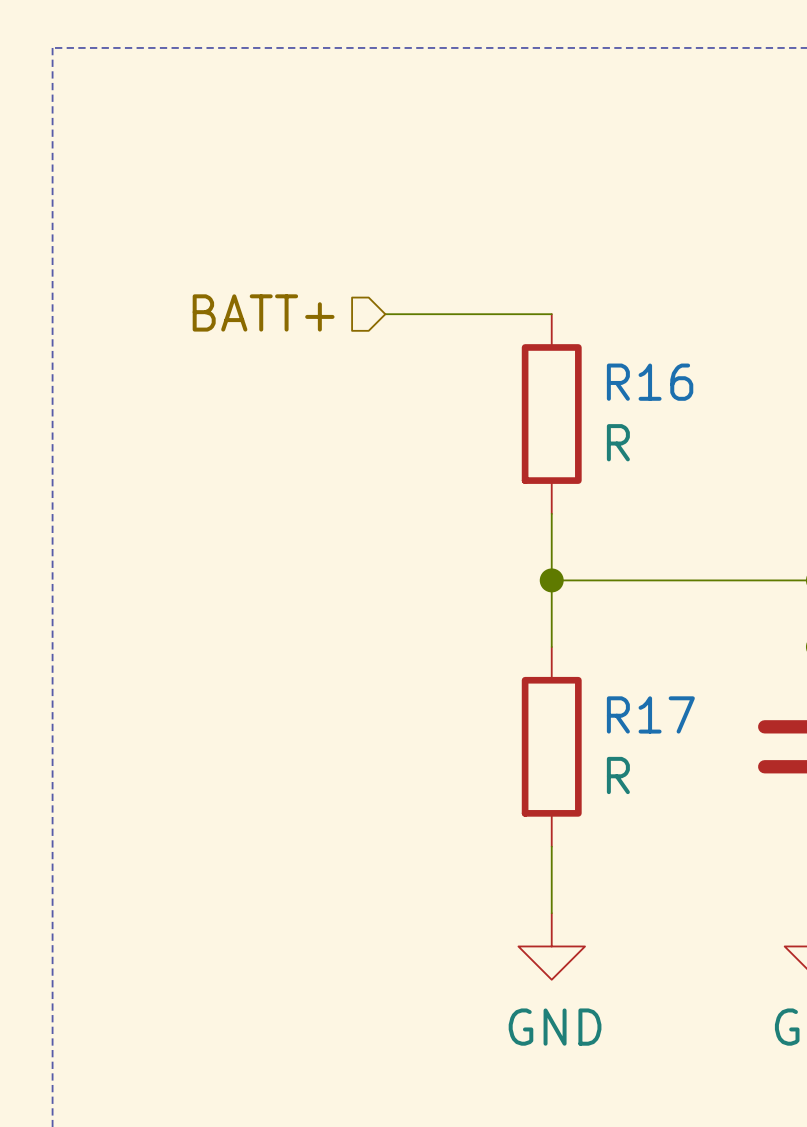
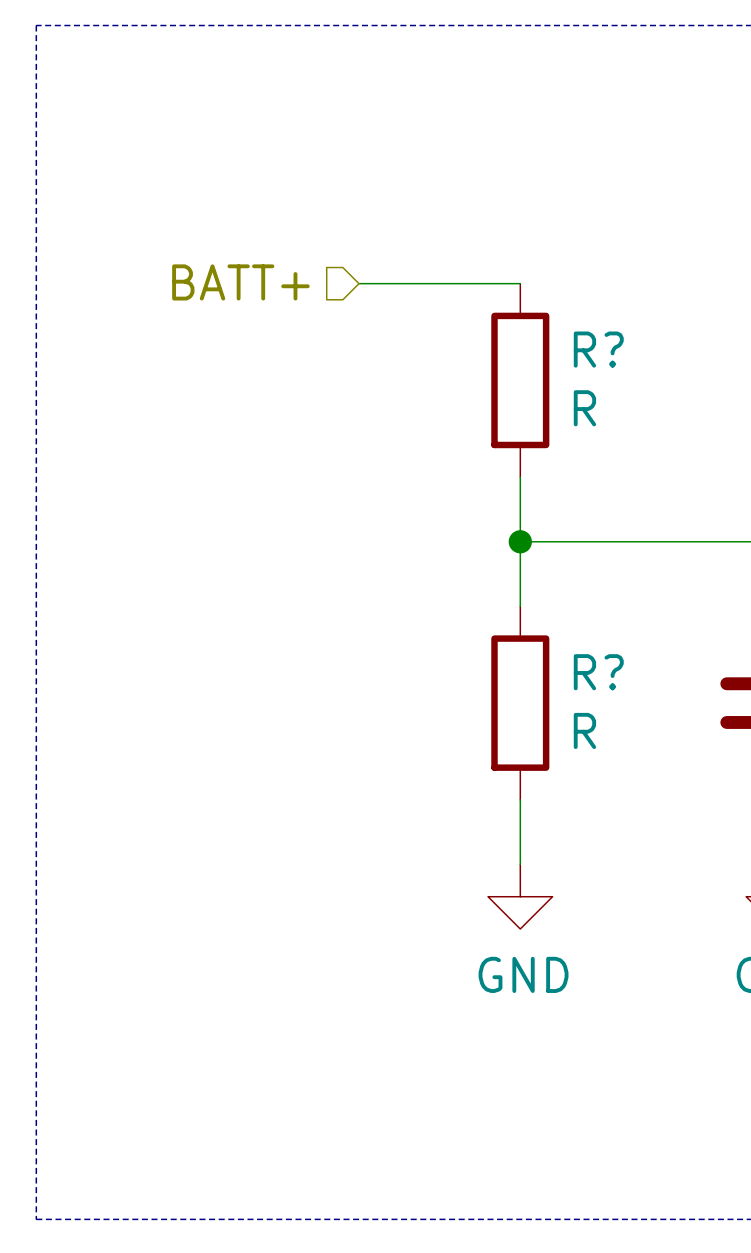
R16 name: R16 (650, 382) -> R? (598, 349)
R17 name: R17 (650, 714) -> R? (598, 672)

